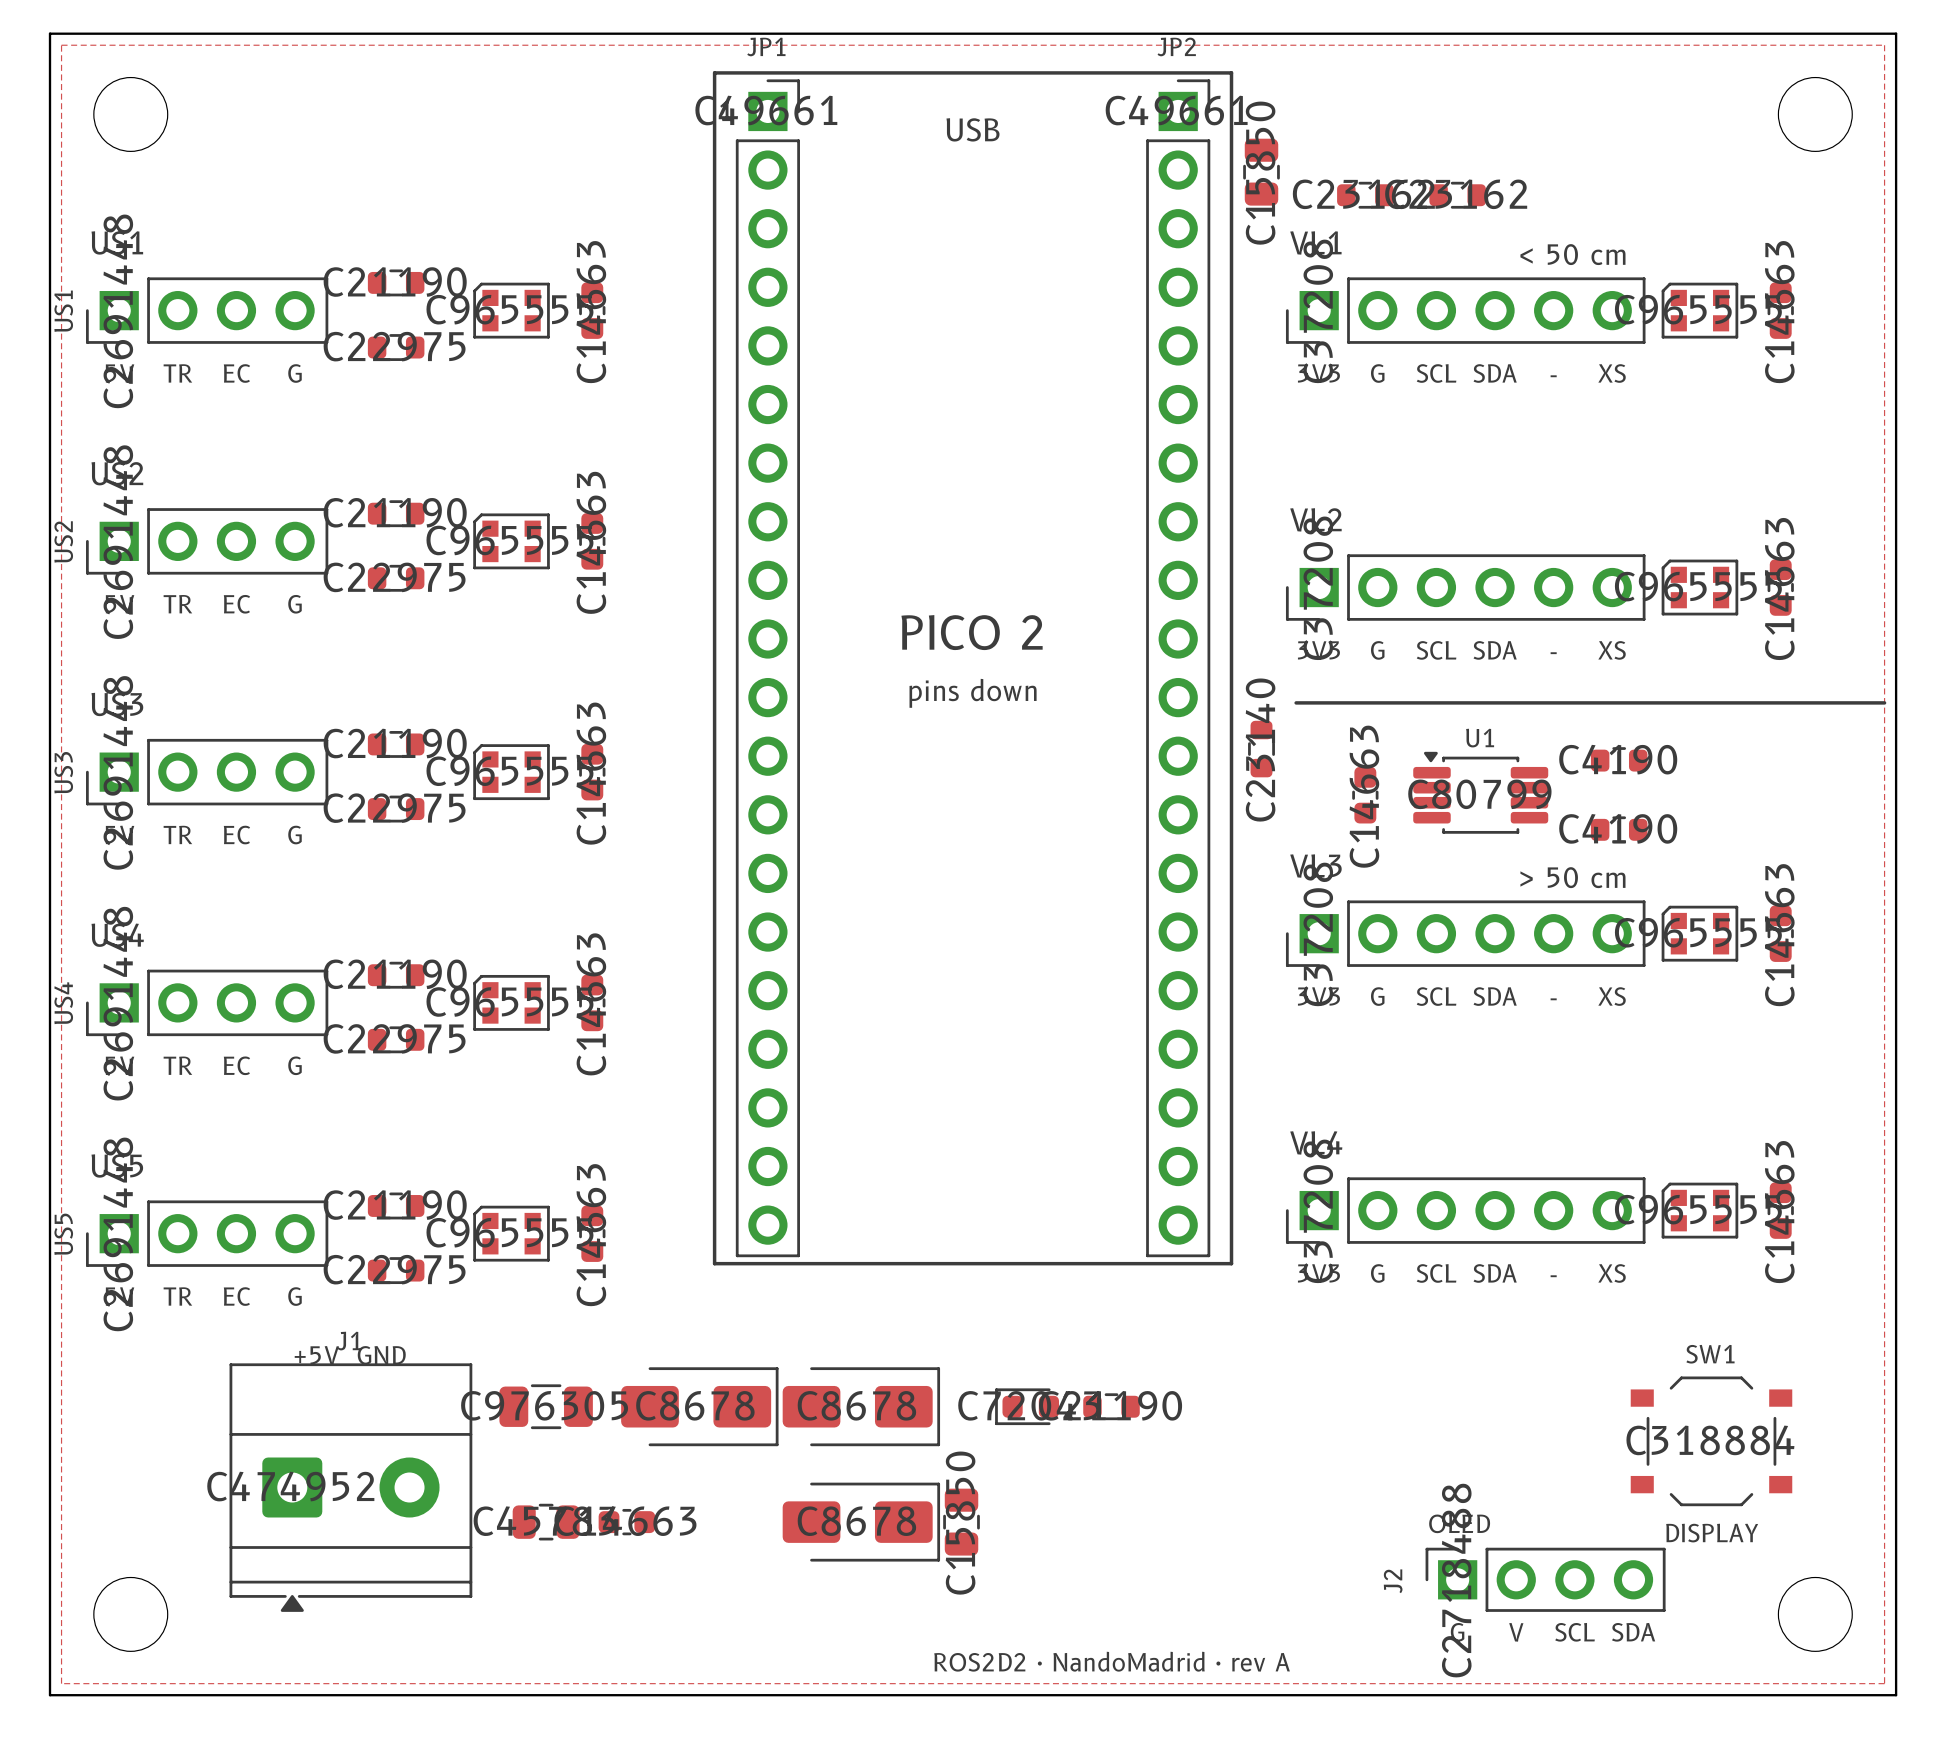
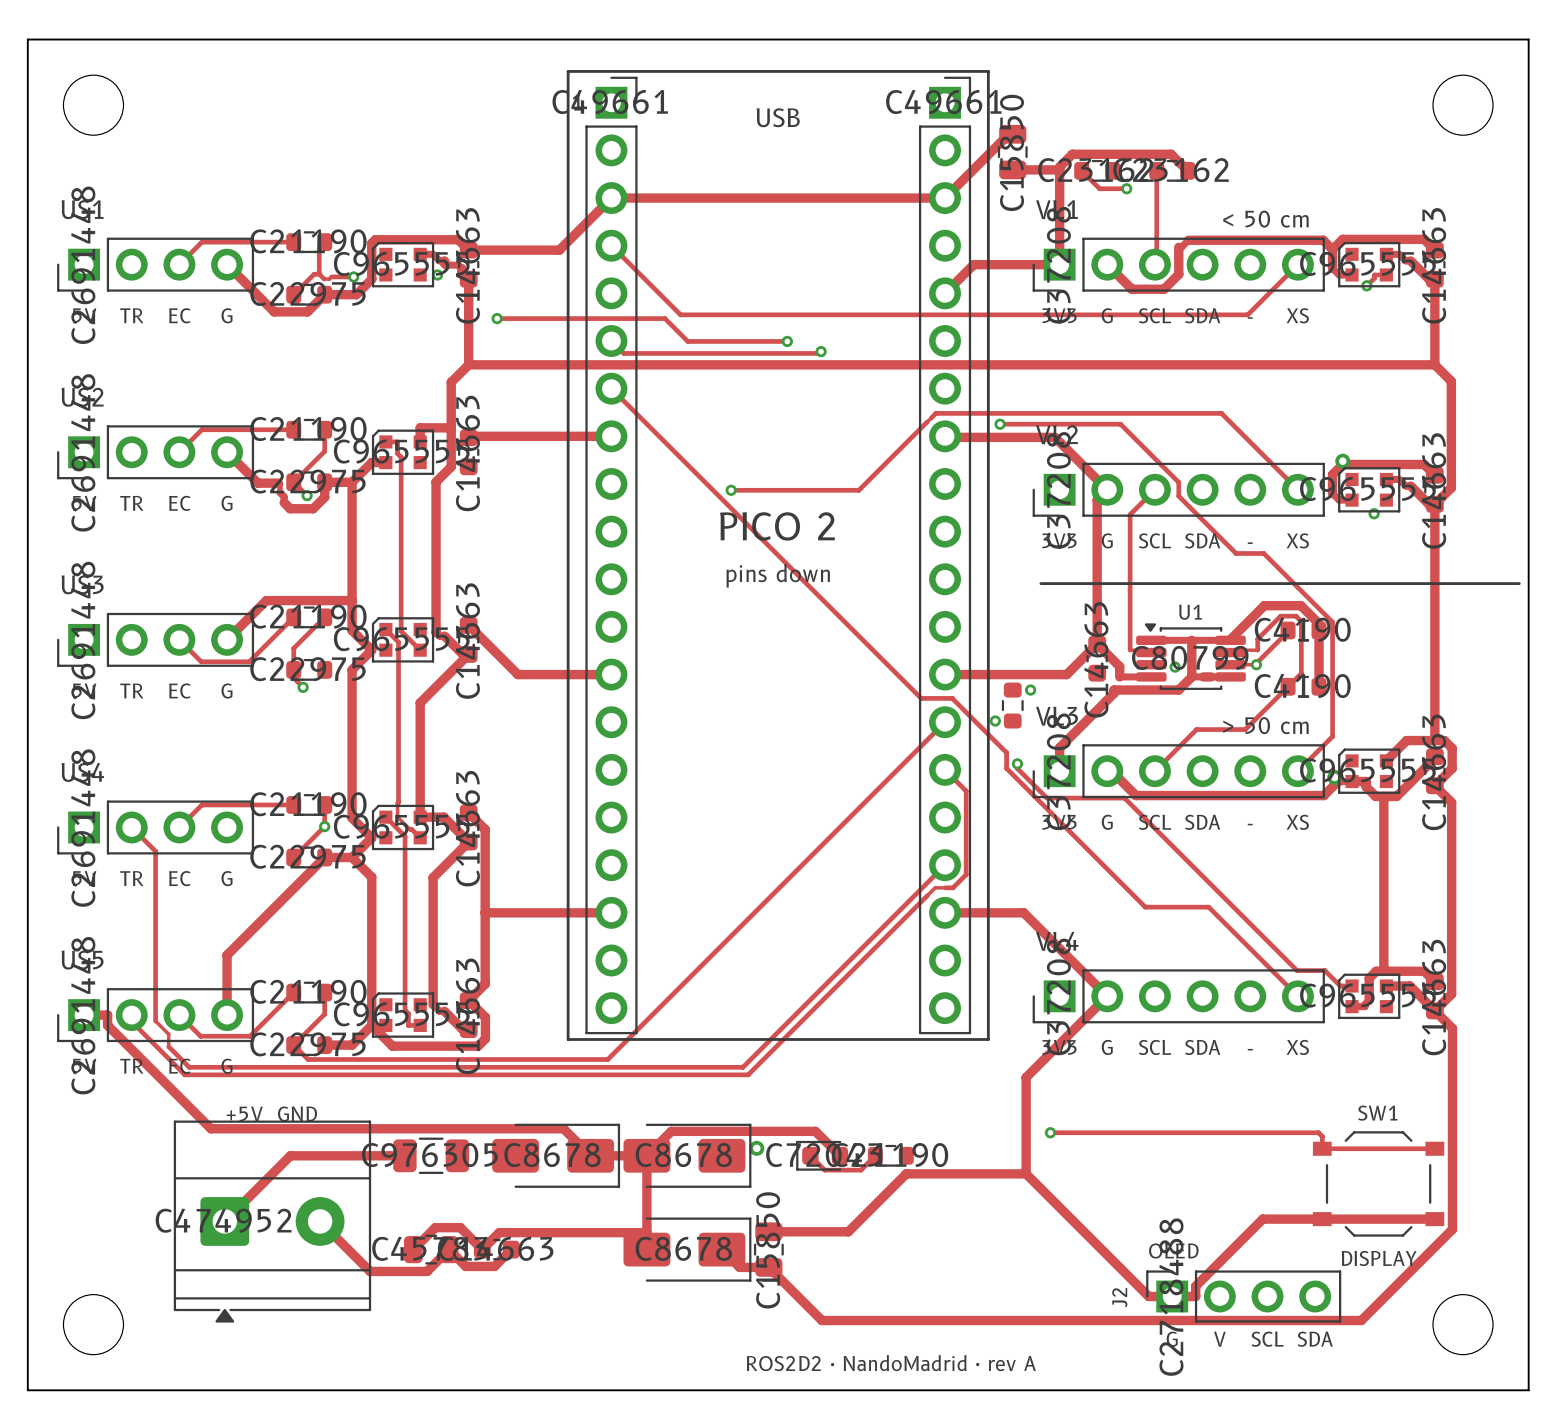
zone outline: (61, 45) (1884, 45) (1884, 1683) (61, 1683) (61, 45) -> none
JP1 name: JP1 (766, 46) -> none
JP2 name: JP2 (1176, 46) -> none
track: none -> (1012, 134) (1008, 134) (945, 198) (611, 198) (559, 250) (468, 250) (458, 239) (375, 239) (371, 243) (371, 279) (356, 294) (324, 294) (307, 311) (274, 311) (227, 264)
track: none -> (1012, 169) (1059, 169)
track: none -> (1081, 170) (1099, 188) (1126, 188)
track: none -> (1156, 170) (1156, 262) (1154, 264)
track: none -> (1187, 170) (1171, 154) (1072, 154) (1059, 167) (1059, 264) (973, 264) (945, 293)
via: none -> (1126, 188)
track: none -> (293, 242) (201, 242) (179, 264)
track: none -> (324, 242) (319, 247) (319, 274)
track: none -> (611, 245) (680, 314) (1247, 314) (1297, 264)
track: none -> (1332, 249) (1323, 240) (1188, 240) (1181, 247) (1178, 247) (1178, 274) (1163, 289) (1131, 289) (1107, 264)
track: none -> (1332, 249) (1332, 268) (1339, 274) (1352, 274)
track: none -> (1332, 249) (1342, 239) (1424, 239) (1434, 250)
track: none -> (420, 254) (433, 254) (439, 260) (444, 260) (446, 265) (458, 265) (461, 268) (461, 272) (468, 279) (468, 364)
track: none -> (1386, 254) (1399, 254) (1405, 260) (1410, 260) (1429, 279) (1434, 279) (1434, 364)
US1 name: US1 (63, 311) -> none
track: none -> (319, 274) (324, 279) (331, 276) (353, 276)
track: none -> (319, 274) (314, 274) (293, 294)
via: none -> (437, 274)
track: none -> (1386, 274) (1374, 274) (1374, 278) (1366, 285)
via: none -> (353, 276)
via: none -> (1366, 285)
track: none -> (497, 318) (664, 318) (687, 341) (787, 341)
via: none -> (497, 318)
track: none -> (611, 341) (623, 353) (819, 353) (821, 351)
via: none -> (787, 341)
via: none -> (821, 351)
track: none -> (468, 364) (1434, 364)
track: none -> (468, 364) (451, 382) (451, 466) (436, 481) (436, 632) (439, 636) (444, 636) (462, 654) (468, 654) (420, 702) (420, 817) (443, 817) (468, 842) (433, 877) (433, 1004) (439, 1011) (444, 1011) (462, 1029) (468, 1029)
track: none -> (1434, 364) (1451, 381) (1451, 487) (1434, 504)
track: none -> (611, 388) (921, 698) (952, 698) (1006, 752) (1006, 768) (1145, 907) (1208, 907) (1297, 996)
track: none -> (927, 421) (858, 490) (731, 490)
track: none -> (927, 421) (935, 413) (1221, 413) (1297, 489)
track: none -> (1000, 424) (1120, 424) (1178, 482) (1178, 496) (1236, 553) (1263, 553) (1332, 622) (1332, 736) (1297, 771)
via: none -> (1000, 424)
track: none -> (451, 427) (420, 427) (420, 441)
track: none -> (293, 429) (201, 429) (179, 452)
track: none -> (324, 429) (324, 451) (293, 482) (307, 495)
track: none -> (611, 436) (468, 437)
track: none -> (945, 436) (1054, 437) (1107, 489) (1097, 499) (1097, 644)
track: none -> (385, 441) (397, 441) (397, 453) (401, 457) (401, 631) (420, 650)
US2 name: US2 (63, 541) -> none
track: none -> (227, 452) (257, 483) (278, 483) (279, 492) (284, 496) (284, 502) (290, 508) (313, 508) (324, 497) (324, 482) (352, 482)
via: none -> (1342, 461)
track: none -> (385, 462) (371, 462) (352, 482)
track: none -> (1342, 464) (1332, 474) (1332, 493) (1339, 500) (1352, 500)
track: none -> (1342, 464) (1424, 464) (1434, 475)
track: none -> (1386, 479) (1399, 479) (1405, 486) (1410, 486) (1429, 504) (1434, 504)
track: none -> (352, 482) (352, 630) (371, 650) (352, 669) (352, 818) (371, 837) (352, 857)
track: none -> (1154, 489) (1130, 514) (1130, 650) (1149, 650) (1151, 652)
via: none -> (731, 490)
via: none -> (307, 495)
track: none -> (1434, 504) (1434, 740)
via: none -> (1374, 513)
track: none -> (352, 600) (266, 600) (227, 639)
track: none -> (293, 617) (249, 661) (201, 661) (179, 639)
track: none -> (324, 617) (293, 648) (293, 678) (303, 687)
part: (1261, 749) -> none
track: none -> (468, 625) (517, 674) (611, 674)
track: none -> (385, 629) (398, 642) (397, 817) (420, 837)
track: none -> (1288, 630) (1256, 662) (1256, 664) (1230, 664)
US3 name: US3 (63, 772) -> none
track: none -> (1151, 640) (1230, 640) (1264, 605) (1300, 605) (1319, 623) (1319, 686)
track: none -> (1191, 640) (1191, 676)
track: none -> (1097, 644) (1119, 666) (1119, 676) (1151, 676)
track: none -> (1097, 644) (1066, 674) (945, 674)
track: none -> (1230, 652) (1232, 650) (1257, 650) (1257, 639) (1280, 616) (1296, 616) (1301, 621) (1301, 673) (1245, 729) (1196, 729) (1154, 771)
via: none -> (1256, 664)
via: none -> (1175, 667)
track: none -> (1191, 676) (1178, 690) (1114, 690) (1114, 693) (1059, 747) (1059, 771)
track: none -> (1191, 676) (1230, 676)
via: none -> (303, 687)
via: none -> (1030, 690)
part: none -> (1012, 705)
via: none -> (995, 721)
track: none -> (945, 722) (607, 1059) (308, 1059) (293, 1045) (324, 1014) (324, 992)
track: none -> (1434, 756) (1396, 796) (1375, 796) (1366, 786) (1366, 781) (1339, 781)
track: none -> (1386, 760) (1406, 740) (1444, 740) (1452, 748) (1452, 768) (1434, 785) (1451, 802) (1451, 994) (1434, 1010)
track: none -> (1017, 763) (1017, 768) (1046, 798) (1124, 798) (1297, 970) (1324, 970) (1340, 986) (1352, 986)
via: none -> (1017, 763)
track: none -> (945, 769) (966, 791) (966, 874) (952, 887) (935, 887) (748, 1074) (184, 1074) (131, 1021) (131, 1015)
track: none -> (1107, 771) (1111, 771) (1136, 795) (1323, 795) (1339, 781)
via: none -> (1334, 777)
track: none -> (1383, 796) (1383, 971)
track: none -> (293, 804) (201, 804) (179, 827)
track: none -> (324, 804) (324, 826) (293, 857)
track: none -> (468, 812) (485, 829) (485, 984) (468, 1000) (485, 1017) (485, 1038) (478, 1046) (392, 1046) (371, 1025)
track: none -> (385, 817) (405, 836) (405, 1010) (408, 1013) (408, 1025) (420, 1025)
via: none -> (324, 826)
track: none -> (131, 827) (155, 851) (155, 1021) (168, 1034) (168, 1046) (189, 1067) (742, 1067) (945, 865)
US4 name: US4 (63, 1003) -> none
track: none -> (352, 857) (371, 877) (371, 1025)
track: none -> (352, 857) (324, 857) (227, 955) (227, 1015)
track: none -> (485, 912) (611, 912)
track: none -> (945, 912) (1023, 912) (1107, 996) (1026, 1077) (1026, 1173)
track: none -> (1434, 981) (1424, 971) (1376, 971) (1369, 978) (1369, 1000) (1364, 1006) (1352, 1006)
track: none -> (1386, 986) (1410, 986) (1452, 1028) (1452, 1229) (1361, 1320) (821, 1320) (768, 1267) (739, 1267) (721, 1249)
track: none -> (293, 992) (250, 1036) (200, 1036) (179, 1015)
track: none -> (84, 1015) (107, 1015) (107, 1025) (210, 1128) (563, 1128) (590, 1155) (646, 1155)
US5 name: US5 (63, 1234) -> none
track: none -> (371, 1025) (352, 1045) (324, 1045)
J1 name: J1 (349, 1341) -> none
track: none -> (1050, 1132) (1318, 1132) (1322, 1136) (1322, 1148) (1434, 1148)
via: none -> (1050, 1132)
via: none -> (756, 1148)
track: none -> (404, 1155) (290, 1155) (224, 1221)
track: none -> (646, 1155) (646, 1249)
track: none -> (646, 1155) (671, 1131) (815, 1131) (839, 1155)
track: none -> (810, 1155) (824, 1170) (860, 1170) (875, 1155)
track: none -> (1026, 1173) (1148, 1296) (1195, 1296) (1195, 1286) (1262, 1219) (1434, 1219)
track: none -> (1026, 1173) (906, 1173) (848, 1231) (768, 1231)
SW1 text: C318884 (1710, 1440) -> none
track: none -> (320, 1221) (370, 1271) (427, 1271) (448, 1249) (465, 1266) (494, 1266) (511, 1249)
track: none -> (646, 1232) (499, 1232) (482, 1249) (460, 1227) (435, 1227) (413, 1249)

